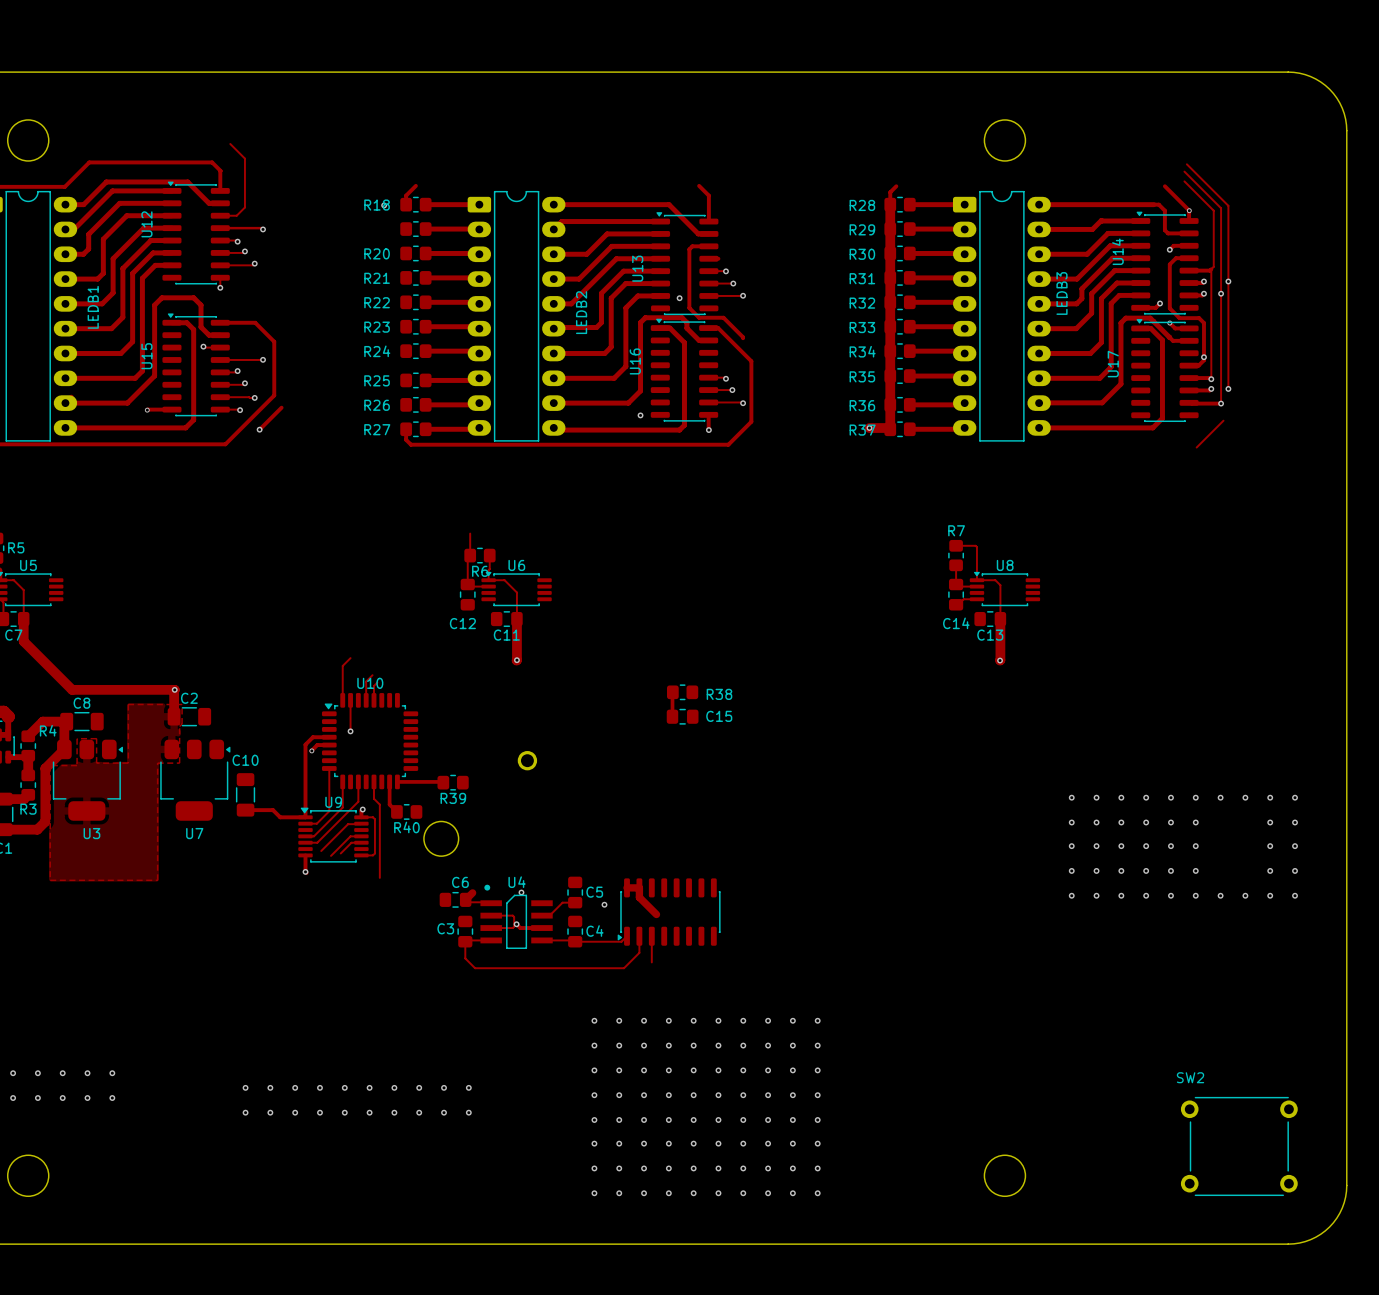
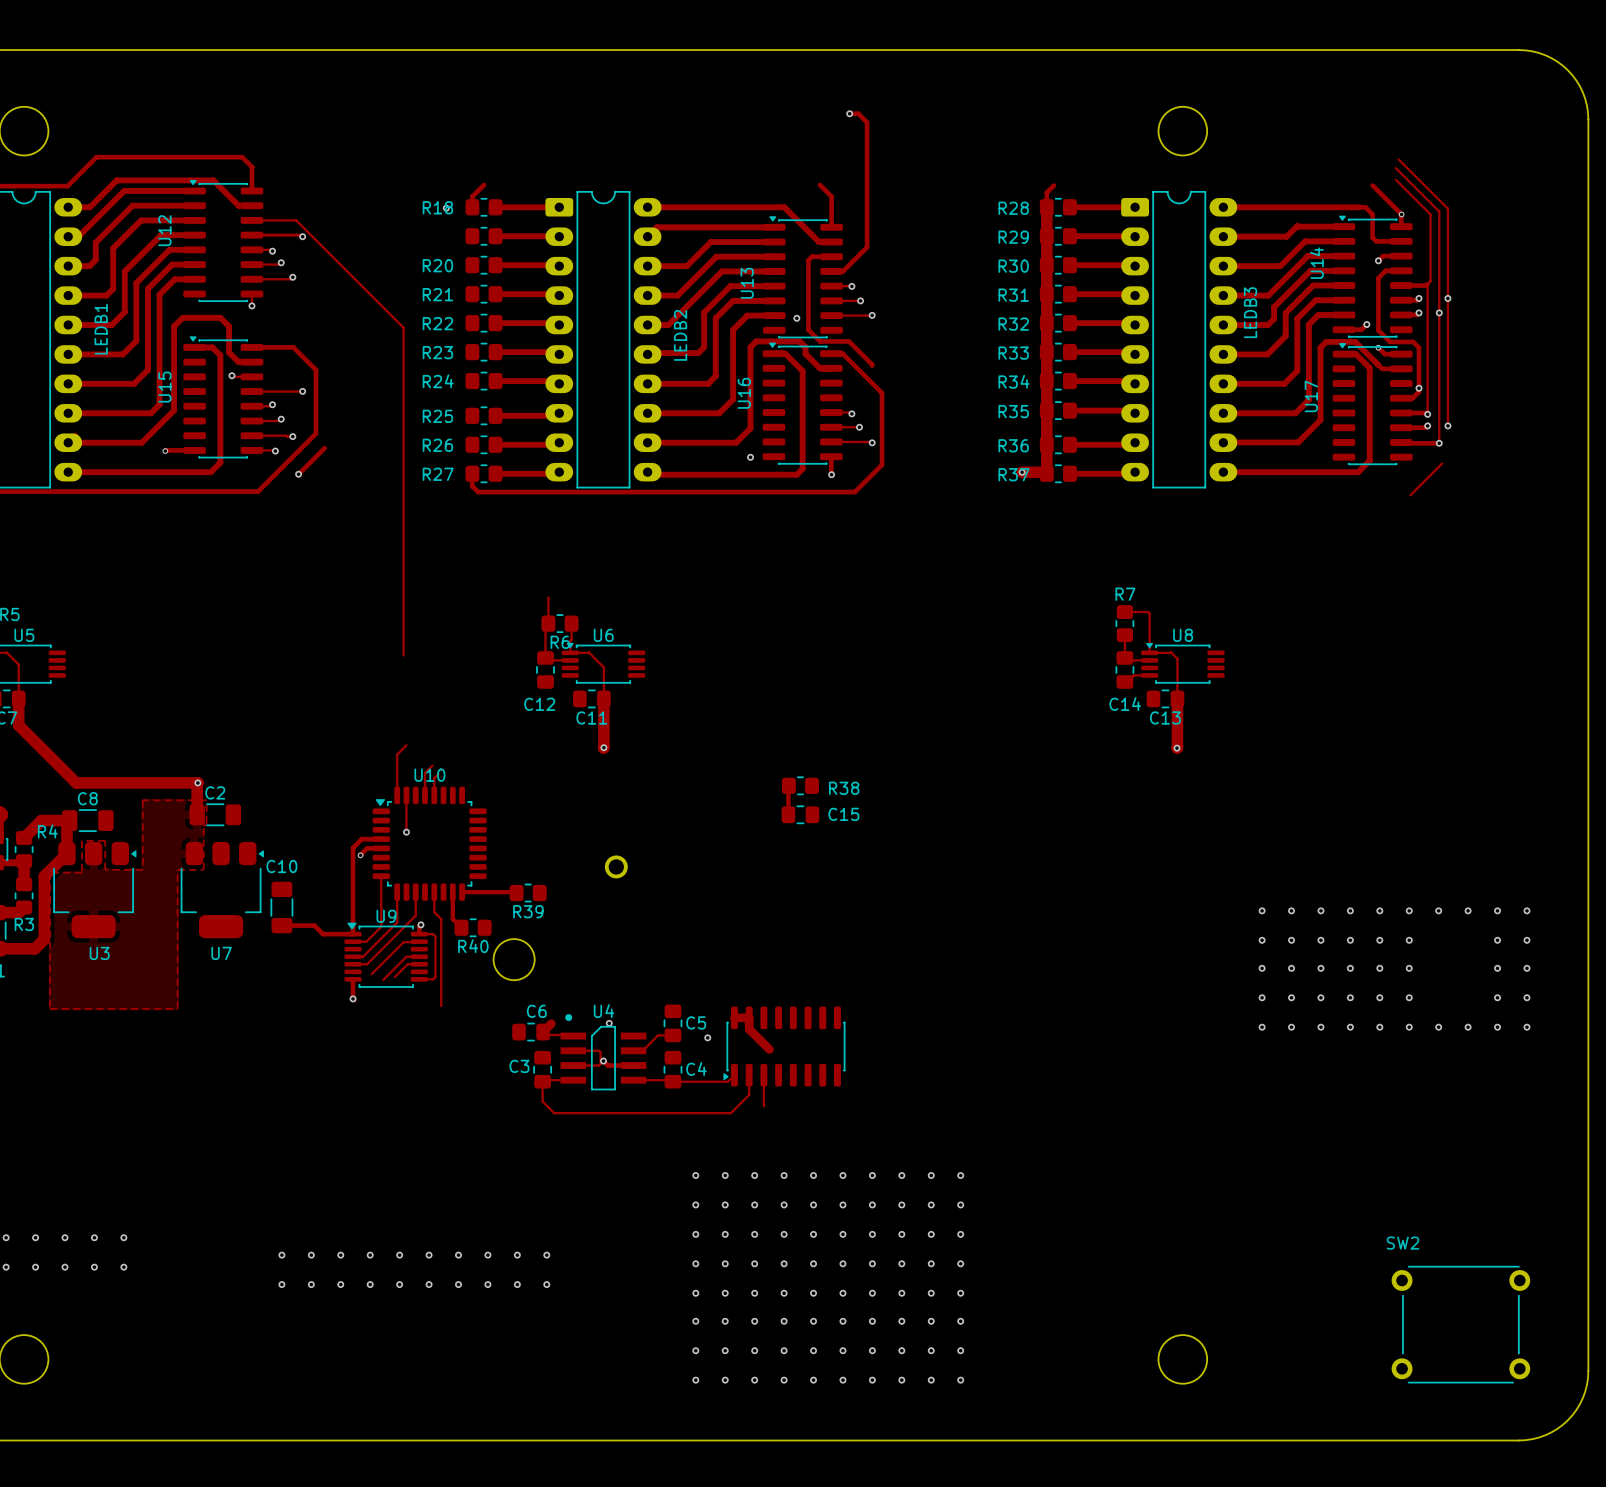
track: none -> (849, 113) (858, 113) (867, 122) (867, 247) (842, 271)
via: none -> (849, 113)
track: (230, 143) (244, 158) (244, 207) (236, 215) -> (403, 655) (403, 327) (296, 220) (271, 220)

